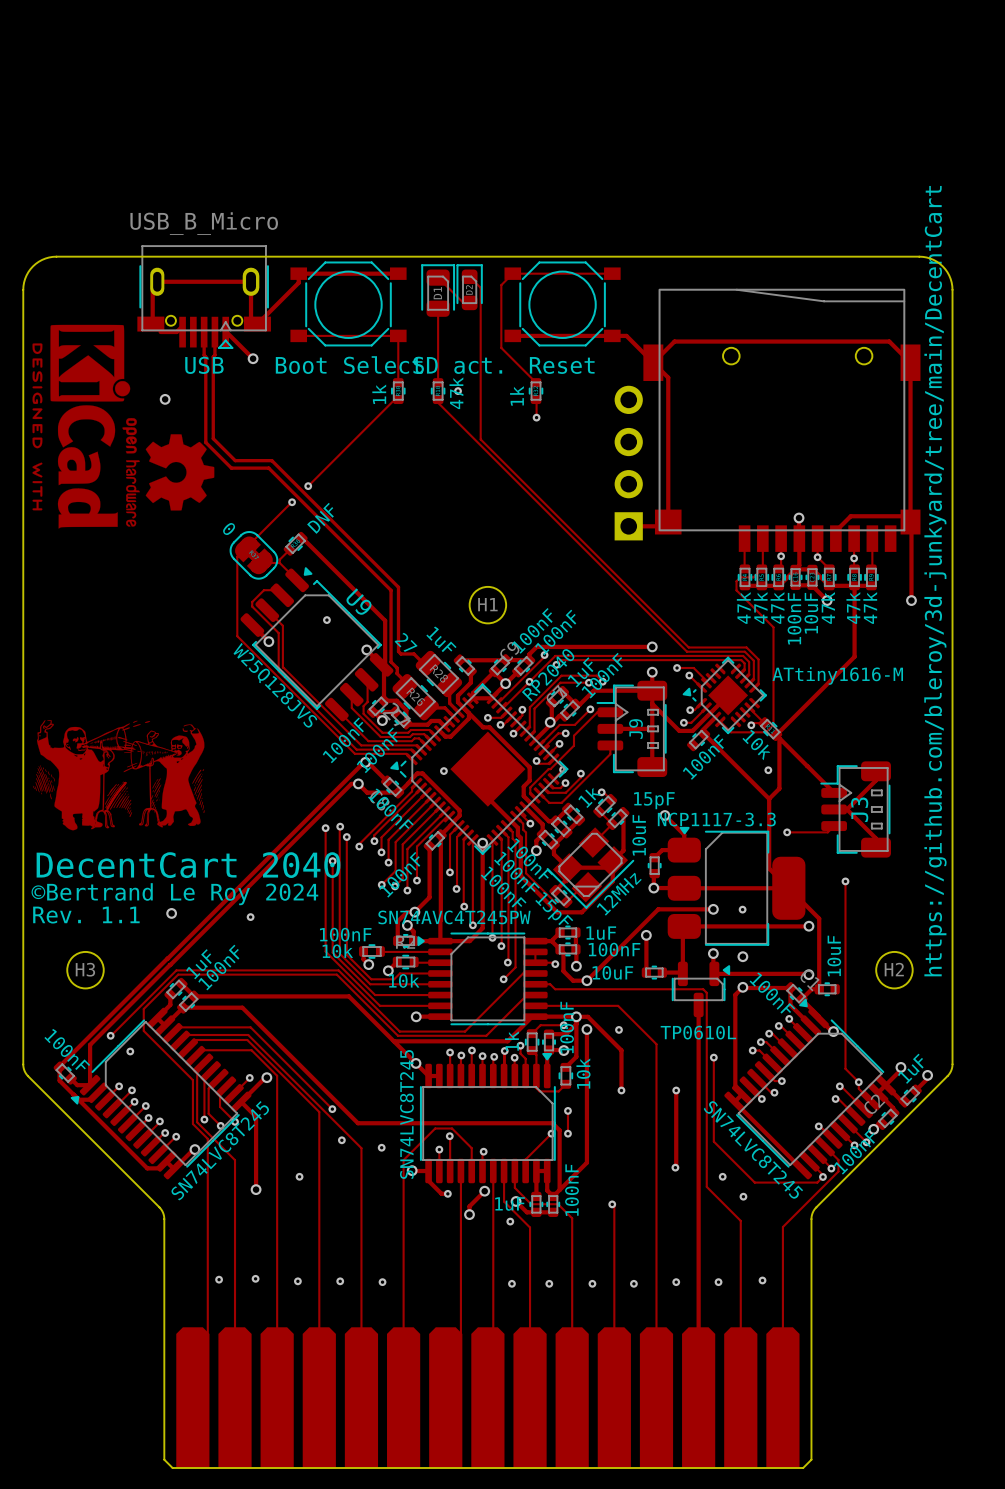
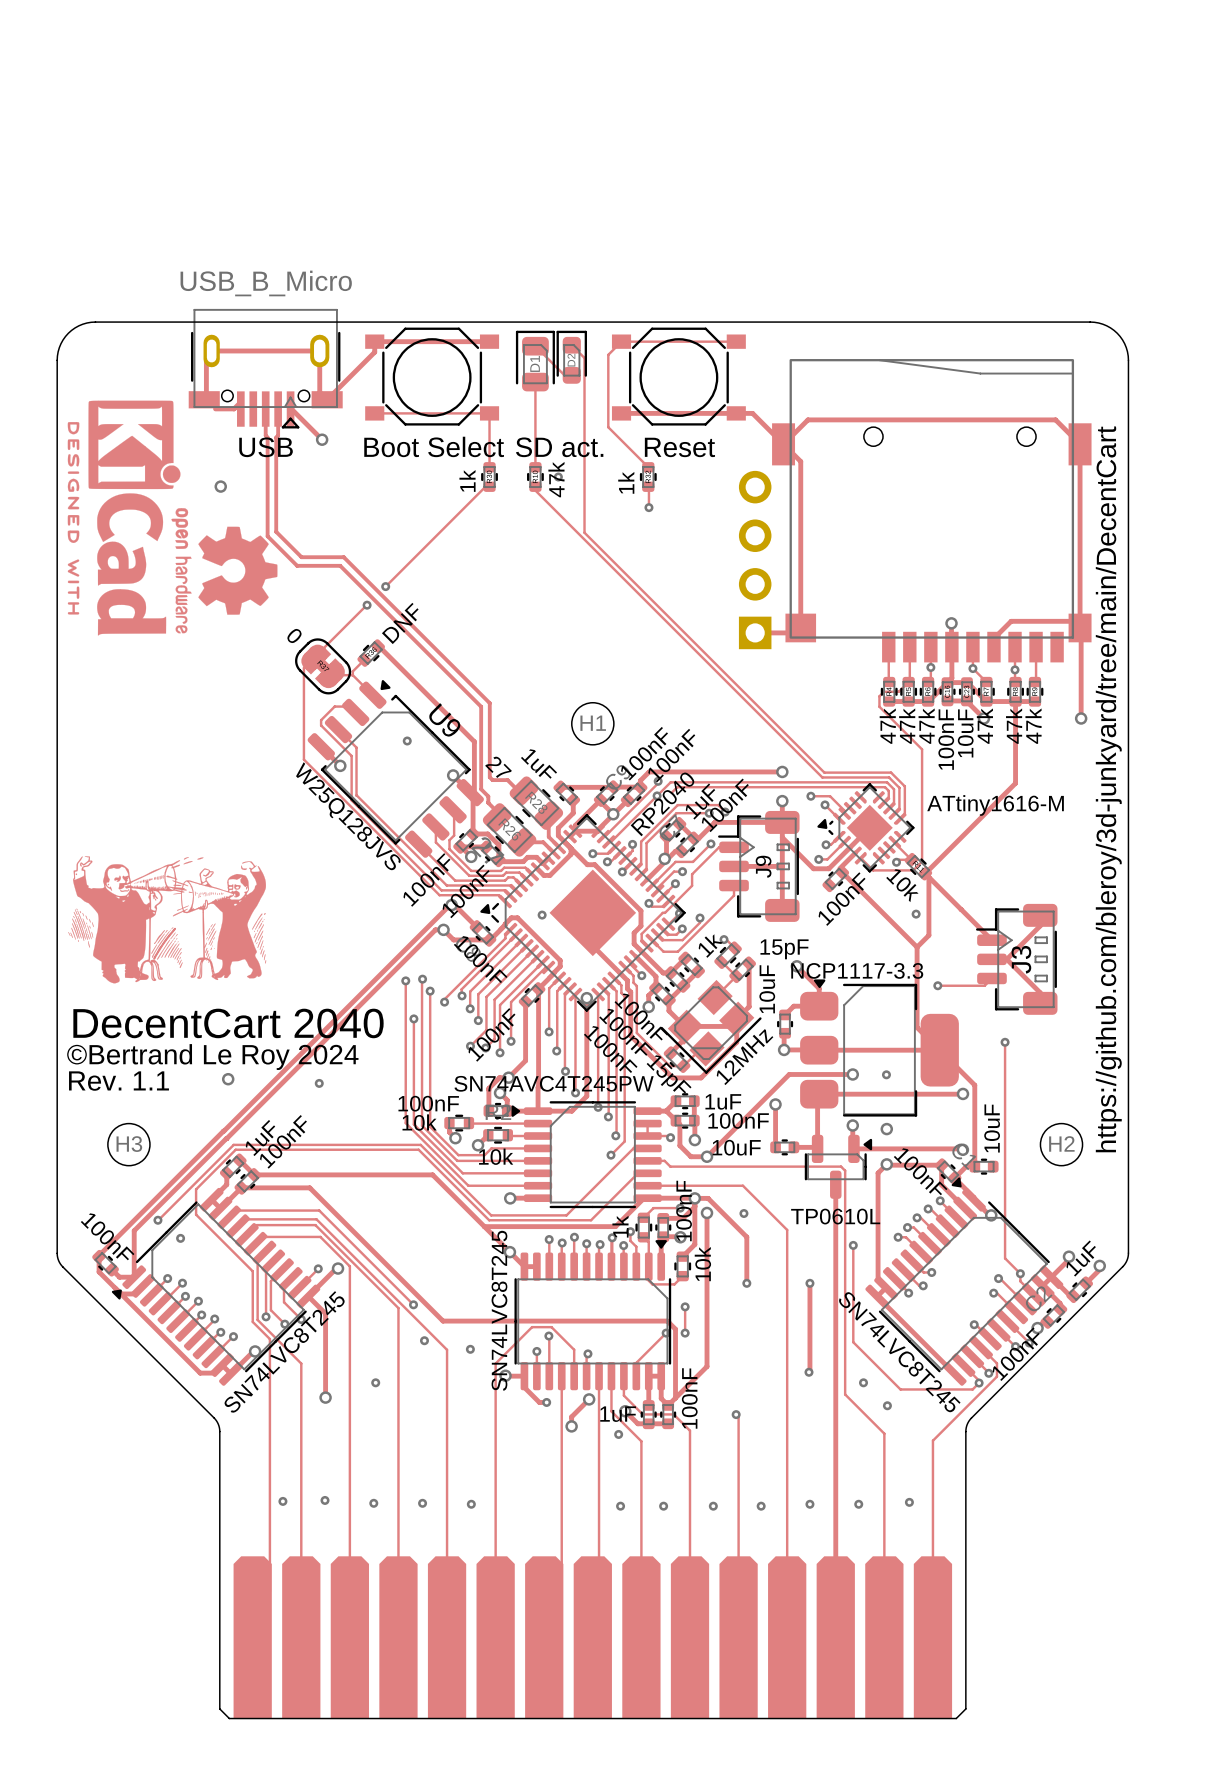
via: (556, 664) -> none
via: none -> (657, 795)
via: (529, 681) -> none

